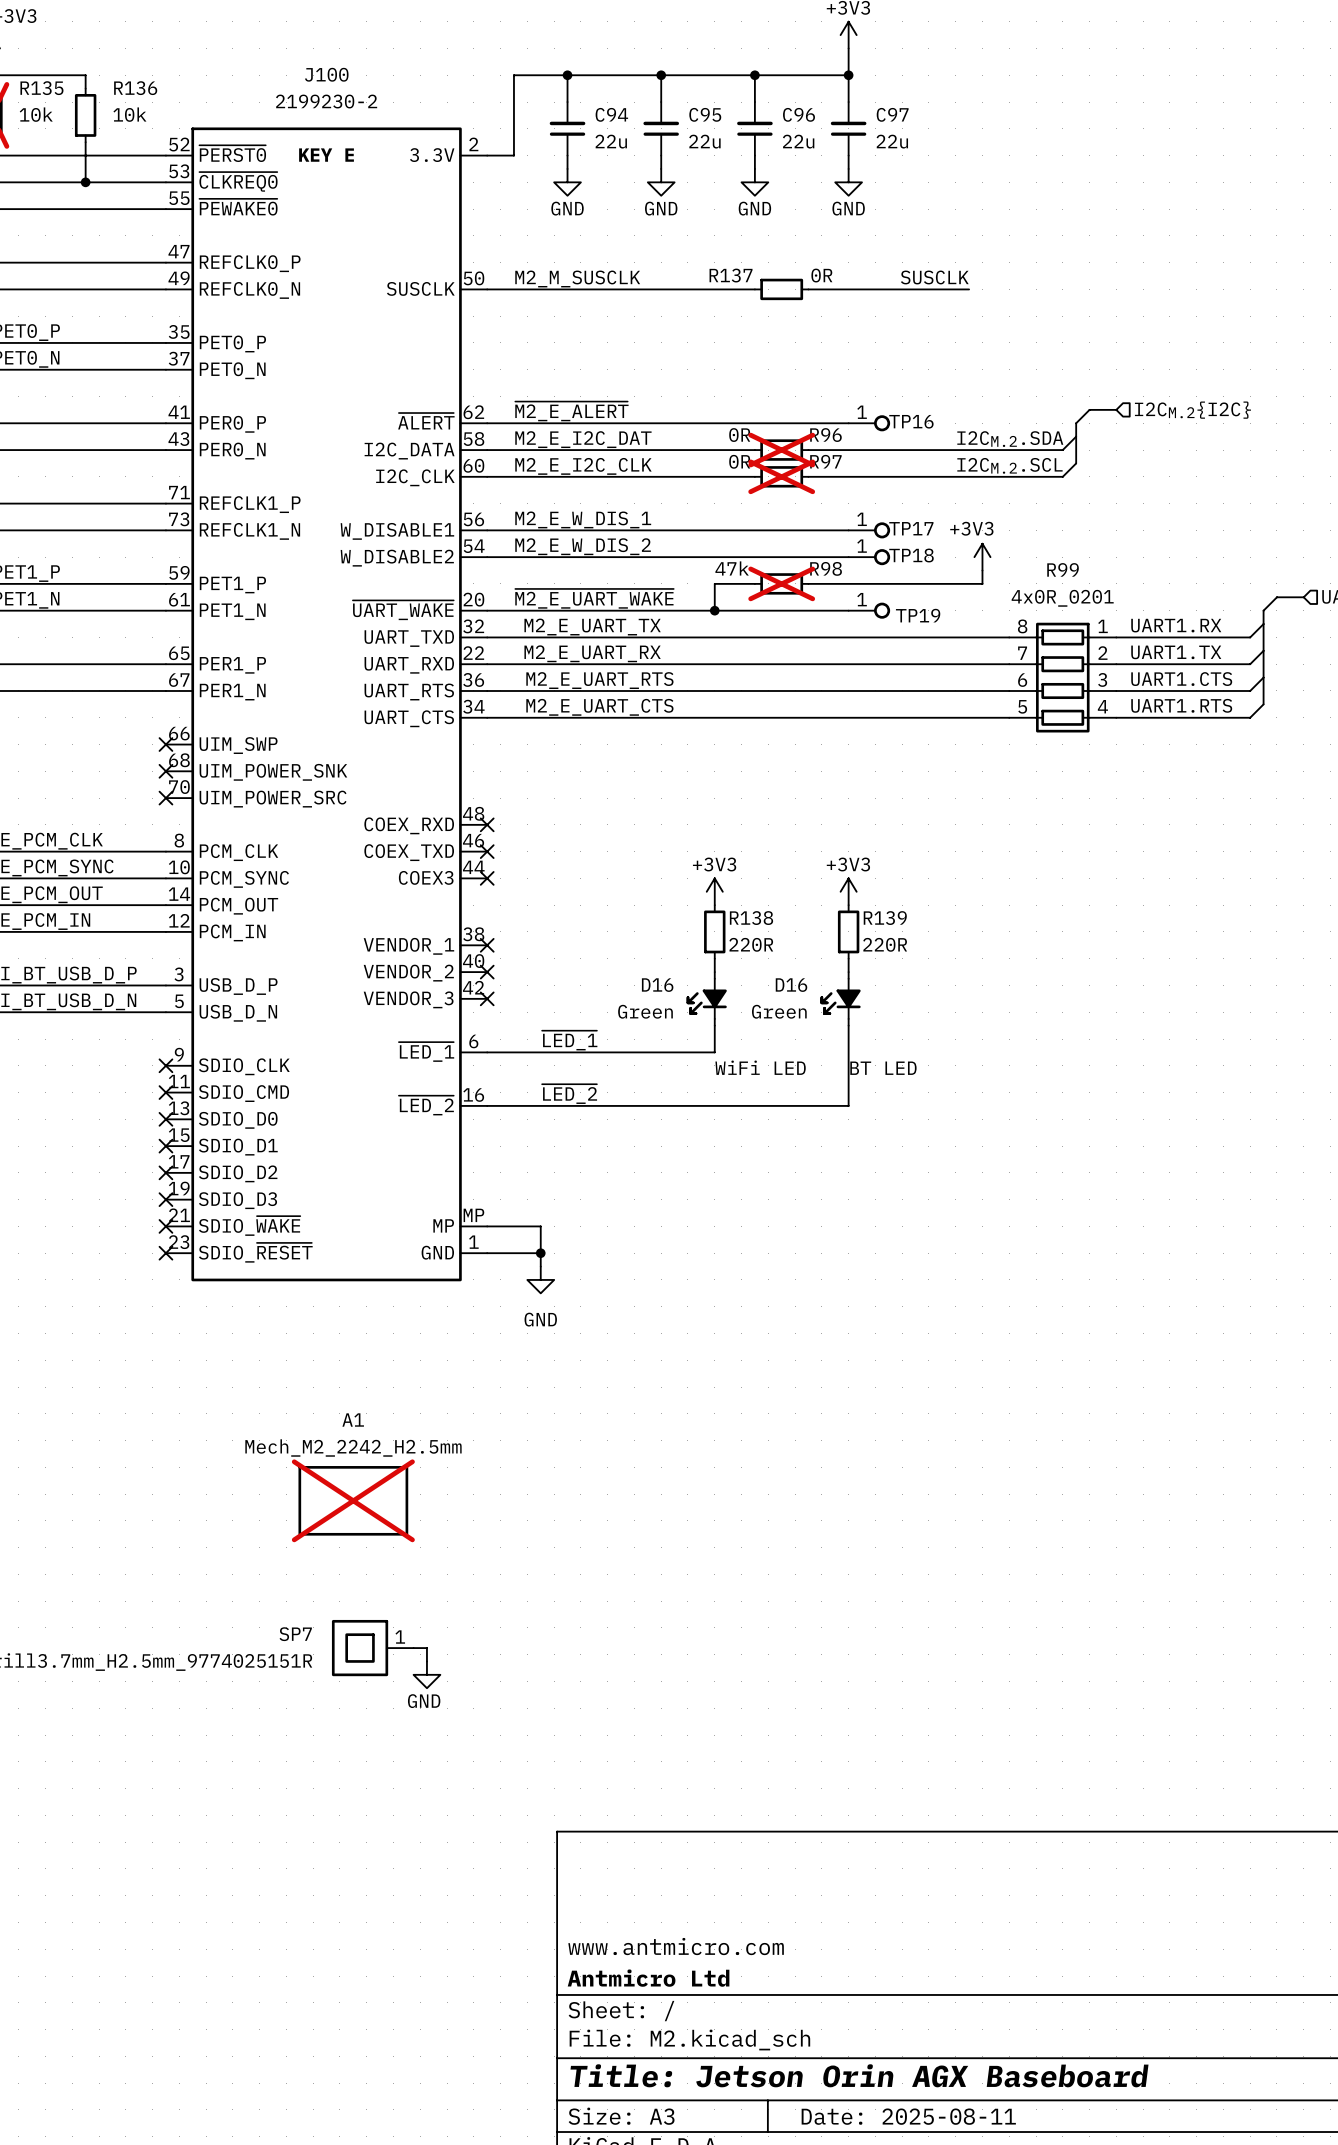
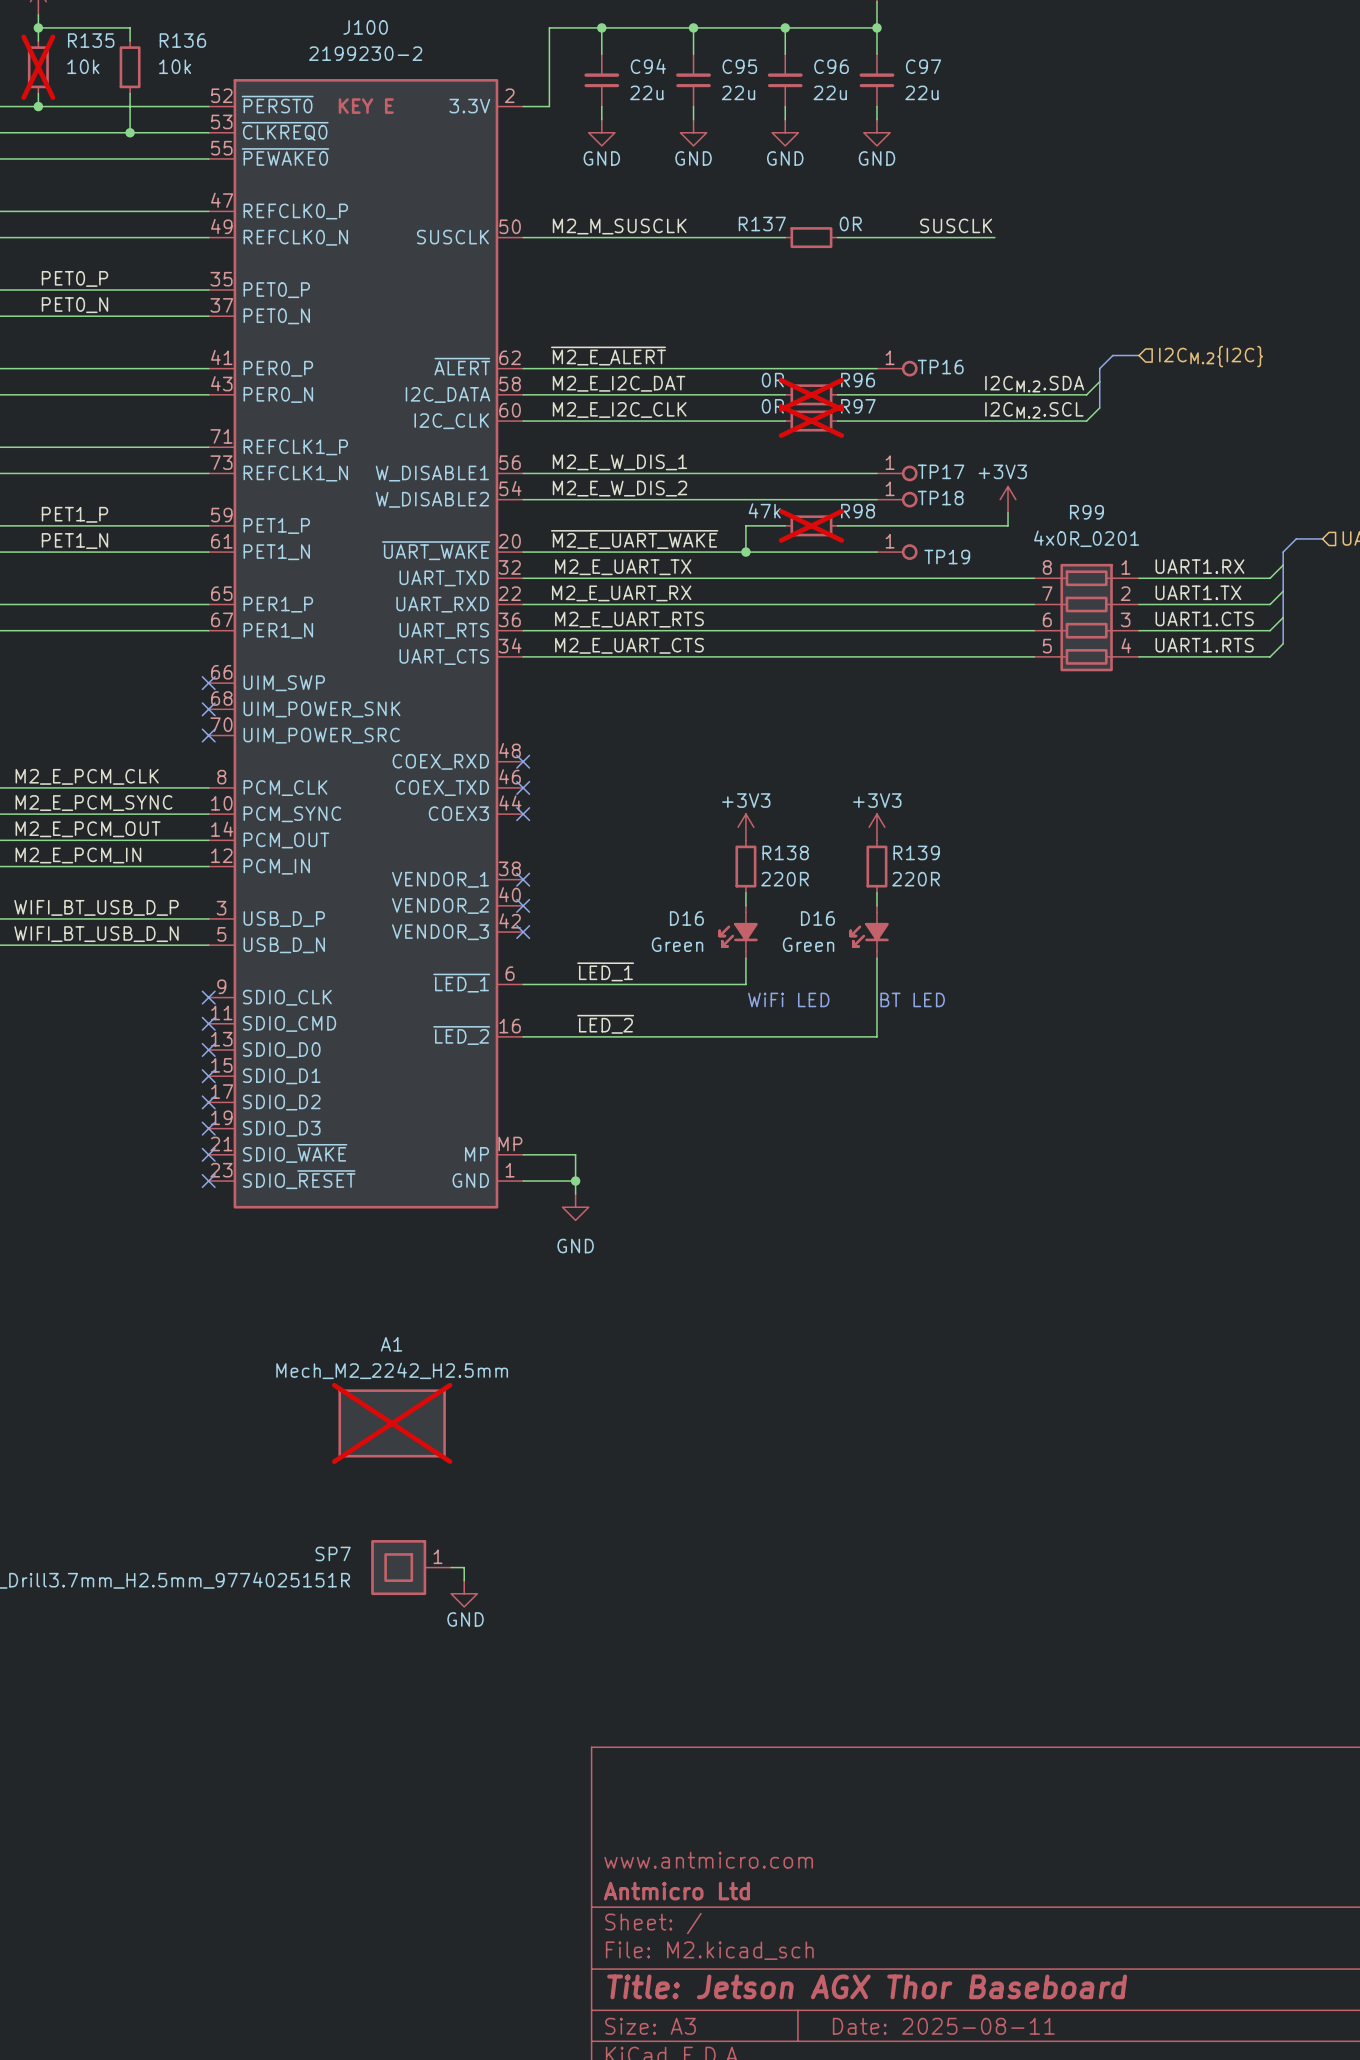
title block: Title: Jetson Orin AGX Baseboard (859, 2075) -> Title: Jetson AGX Thor Baseboard (867, 1986)

